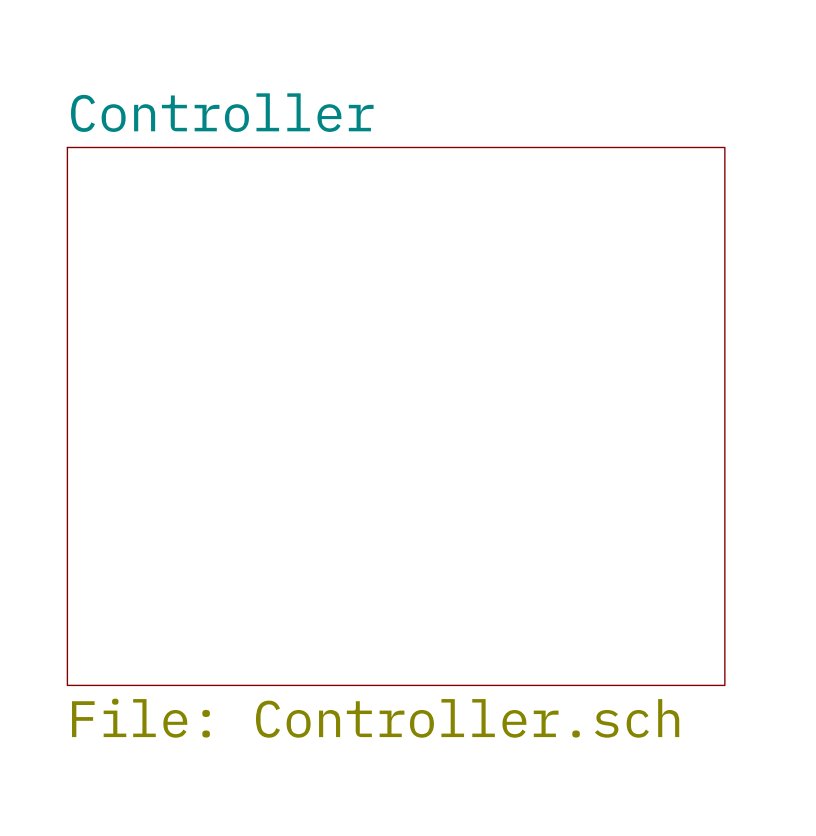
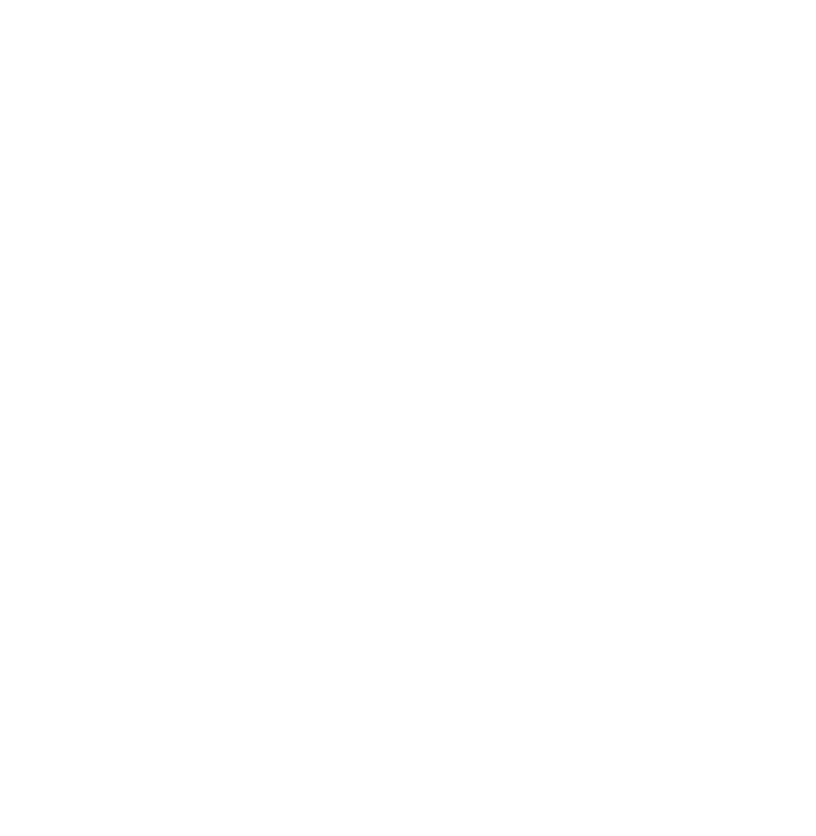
sheet Controller: File: Controller.sch (396, 416) -> none

